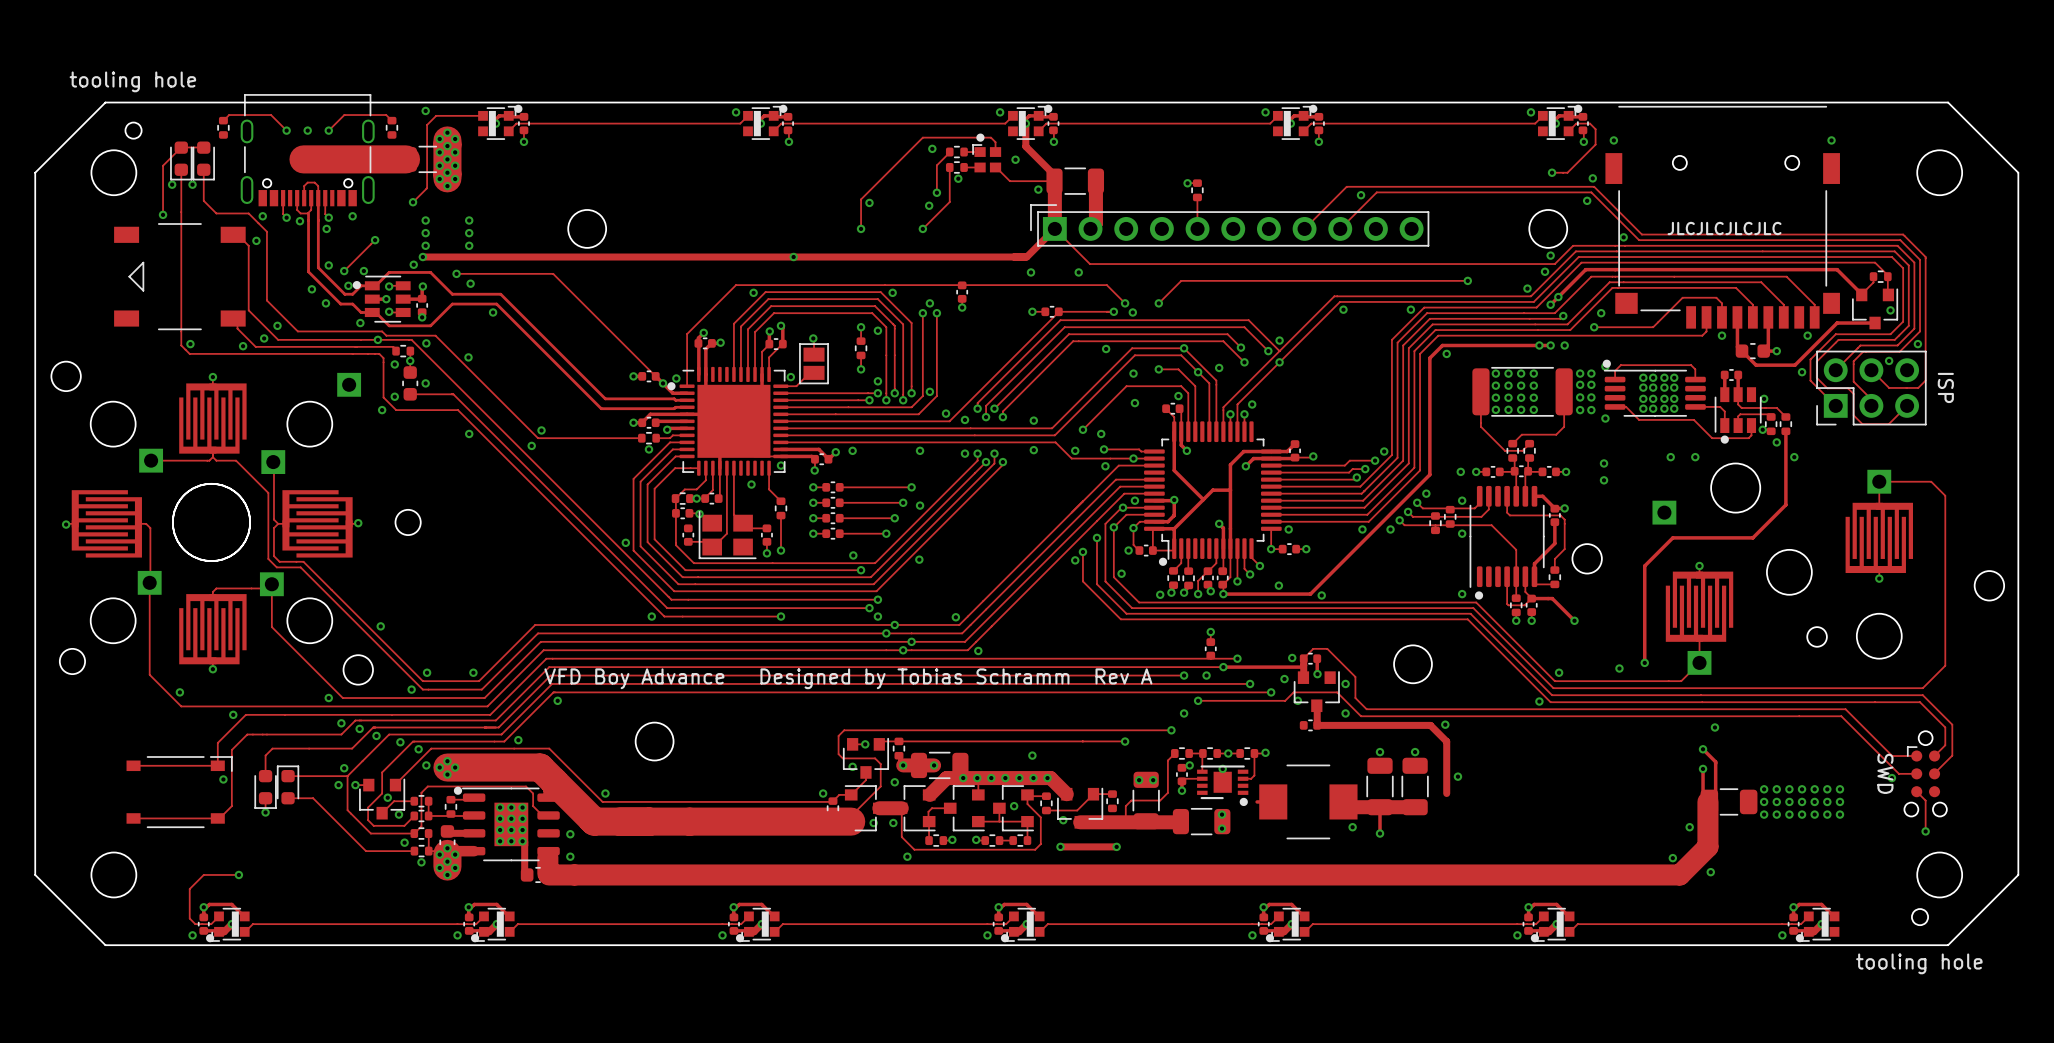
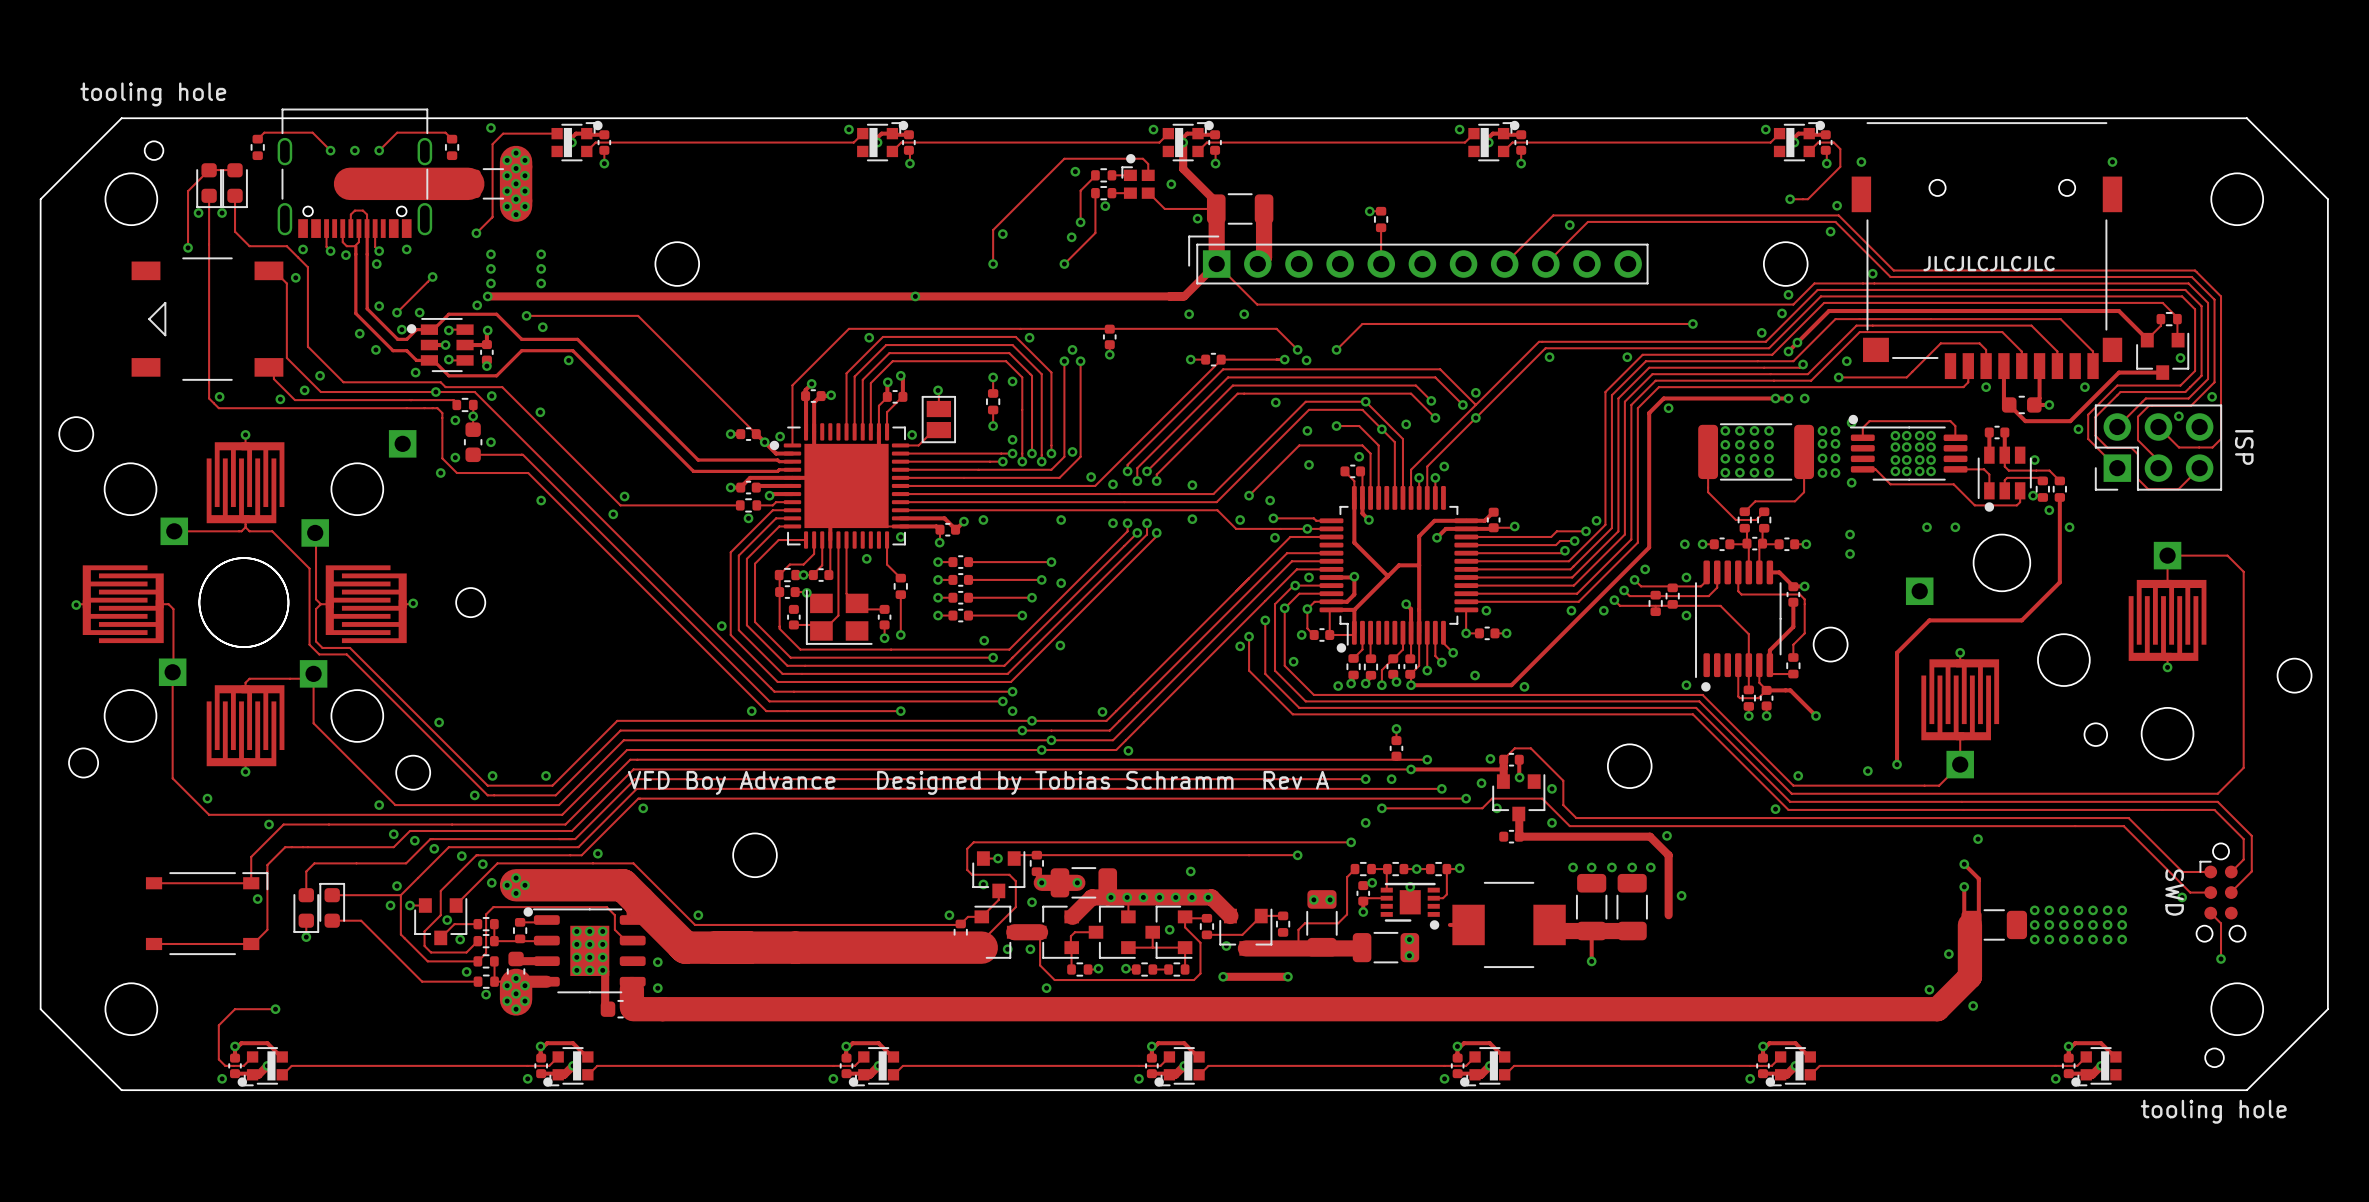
via: none -> (1573, 867)
via: none -> (1611, 867)
via: none -> (1650, 867)
via: (1352, 827) -> none

